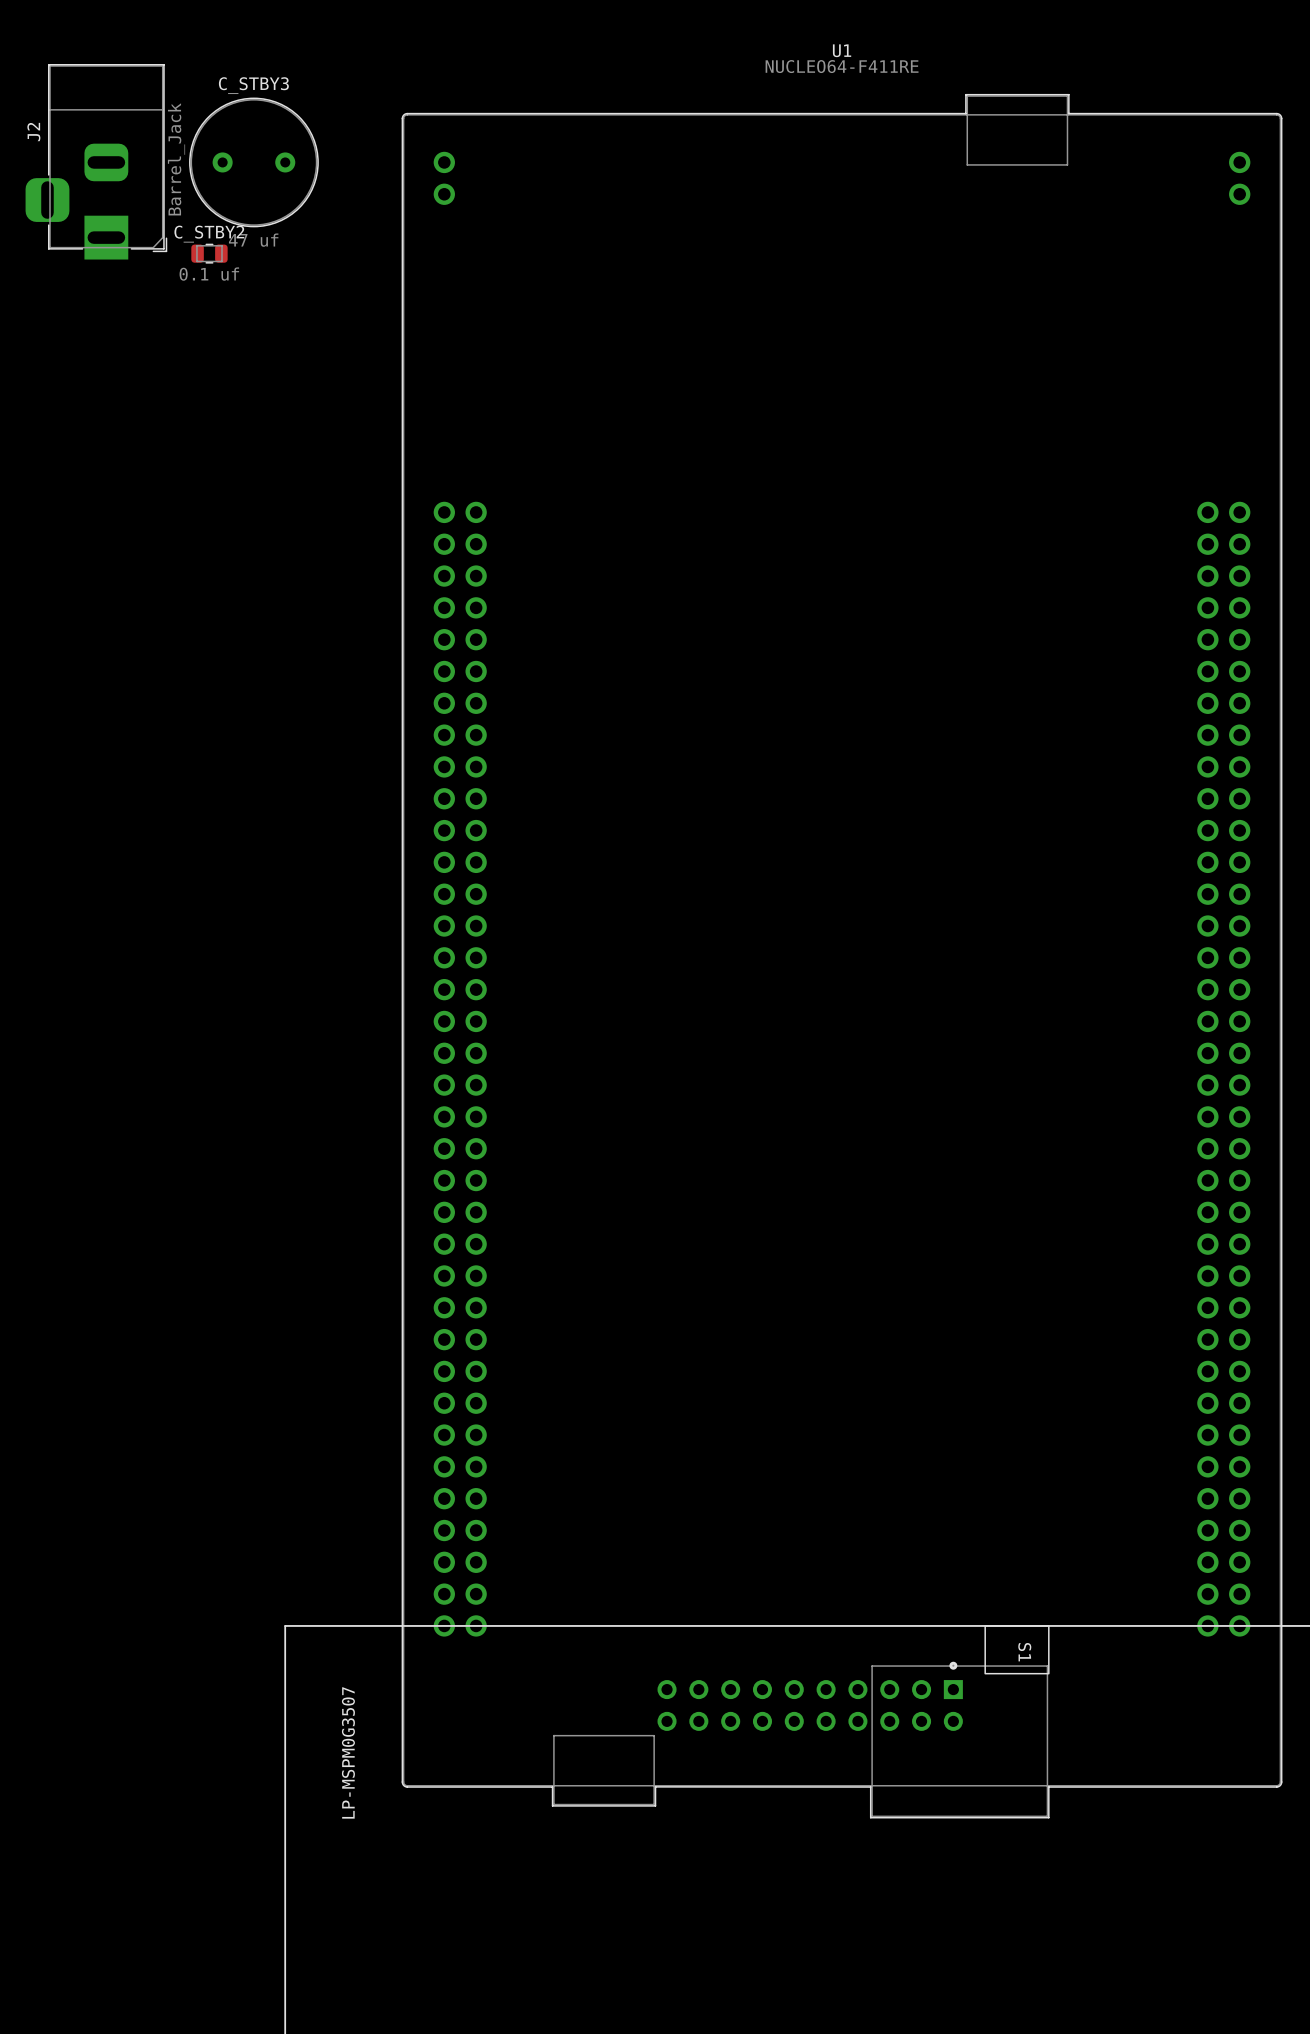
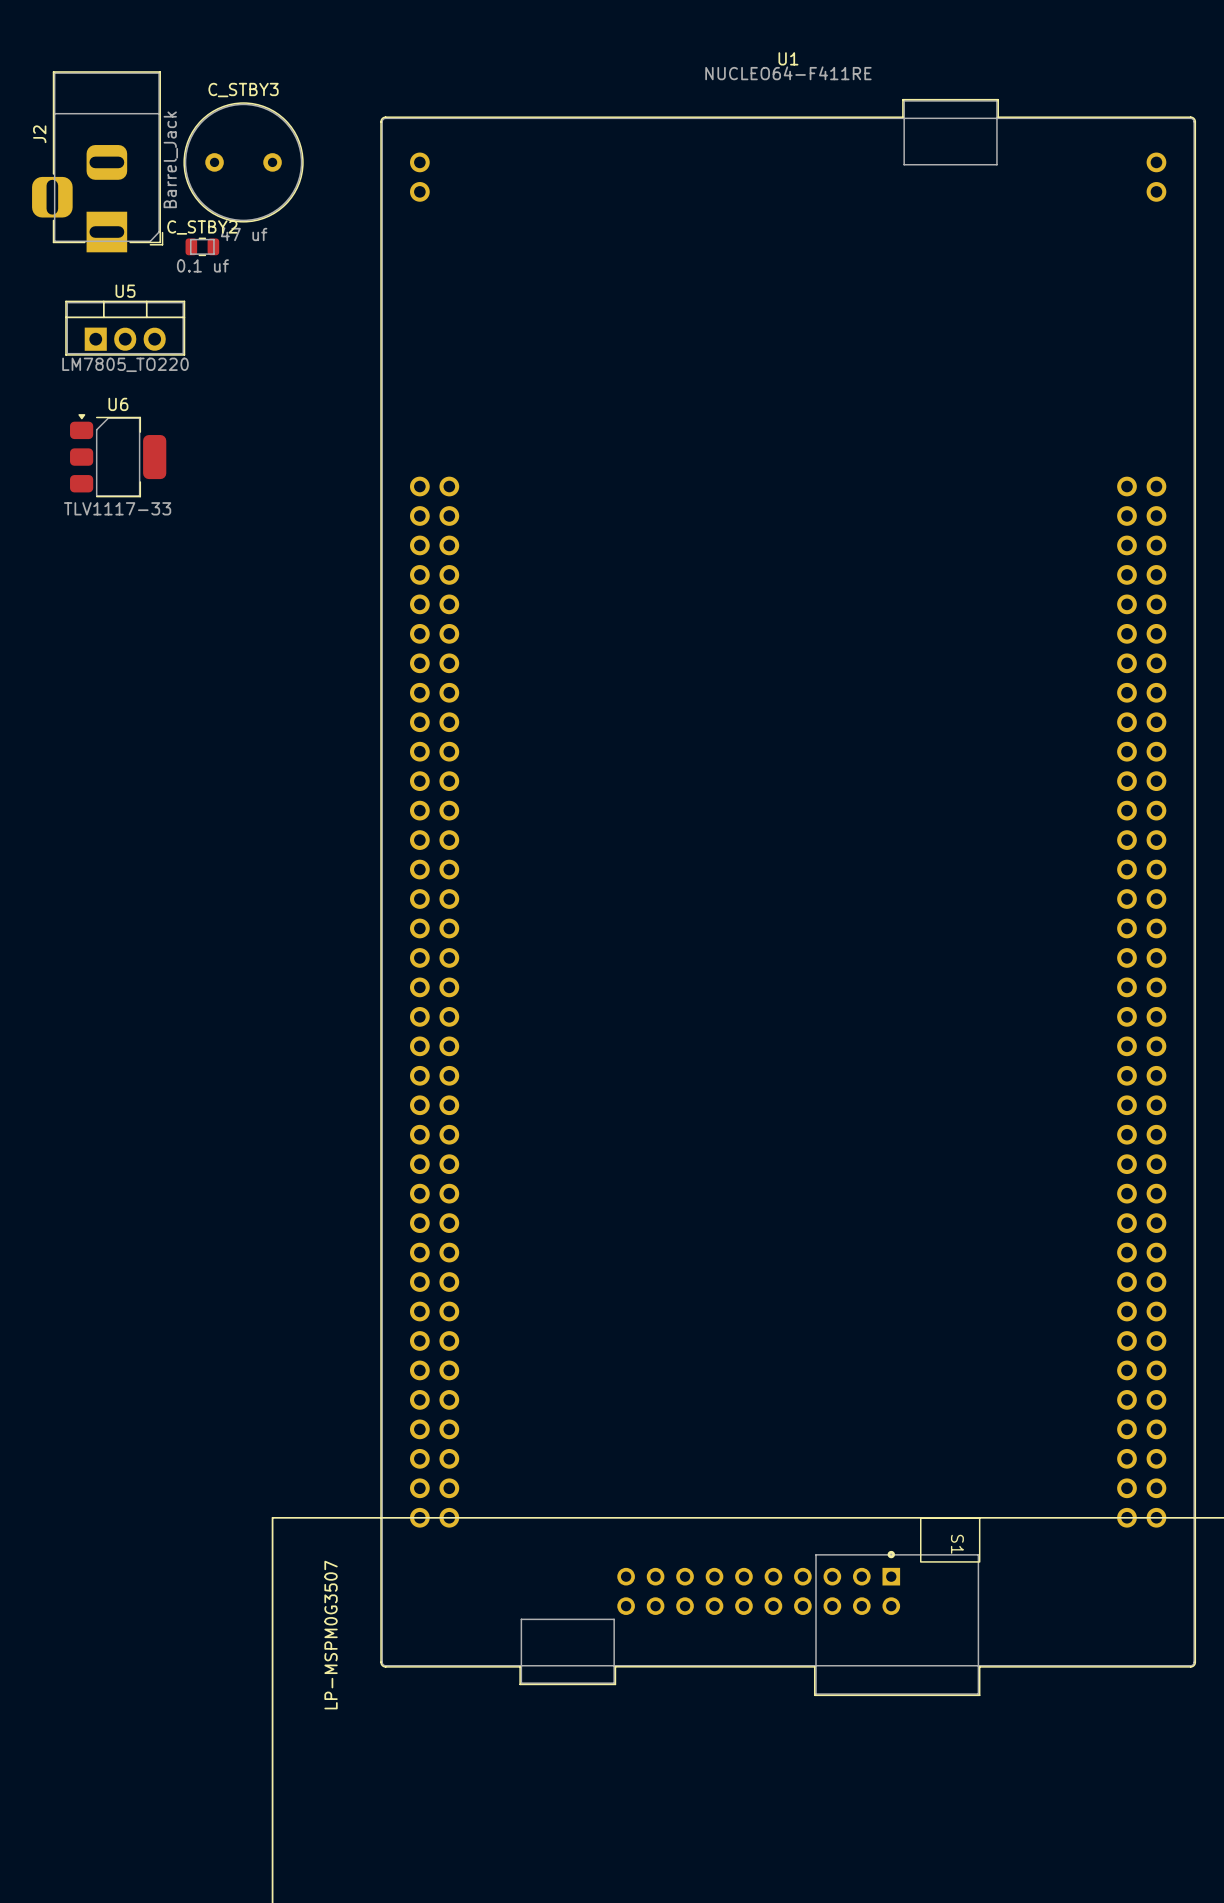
U5: none -> LM7805_TO220 (125, 328)
U6: none -> TLV1117-33 (118, 455)

